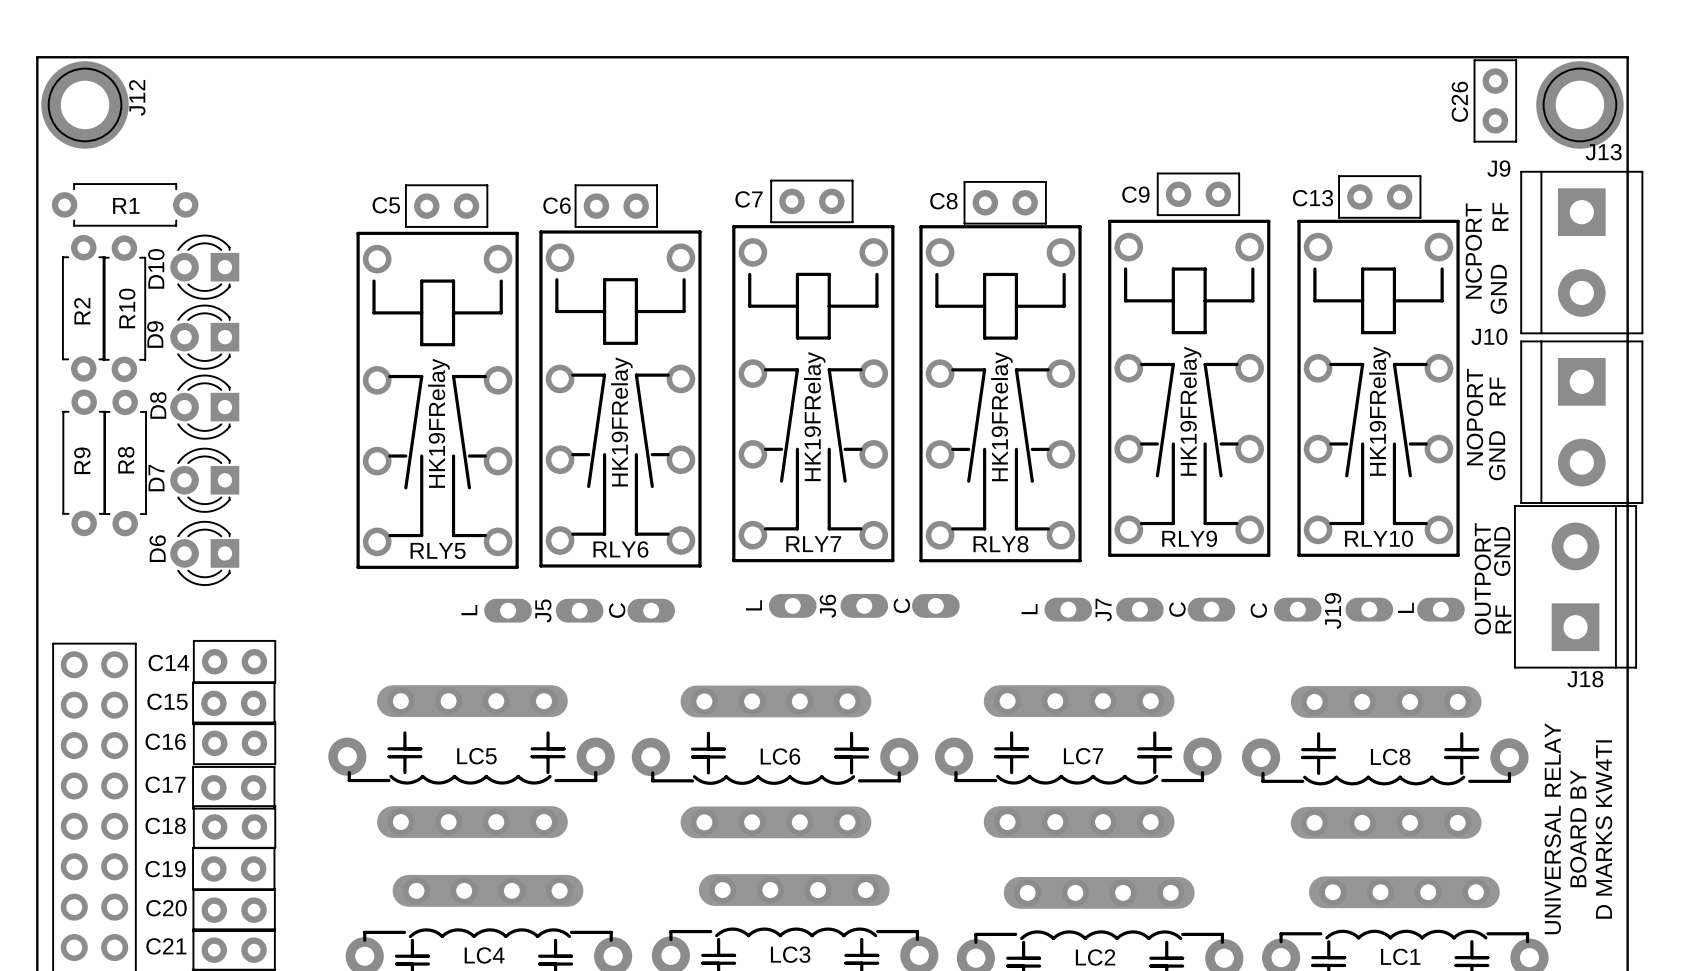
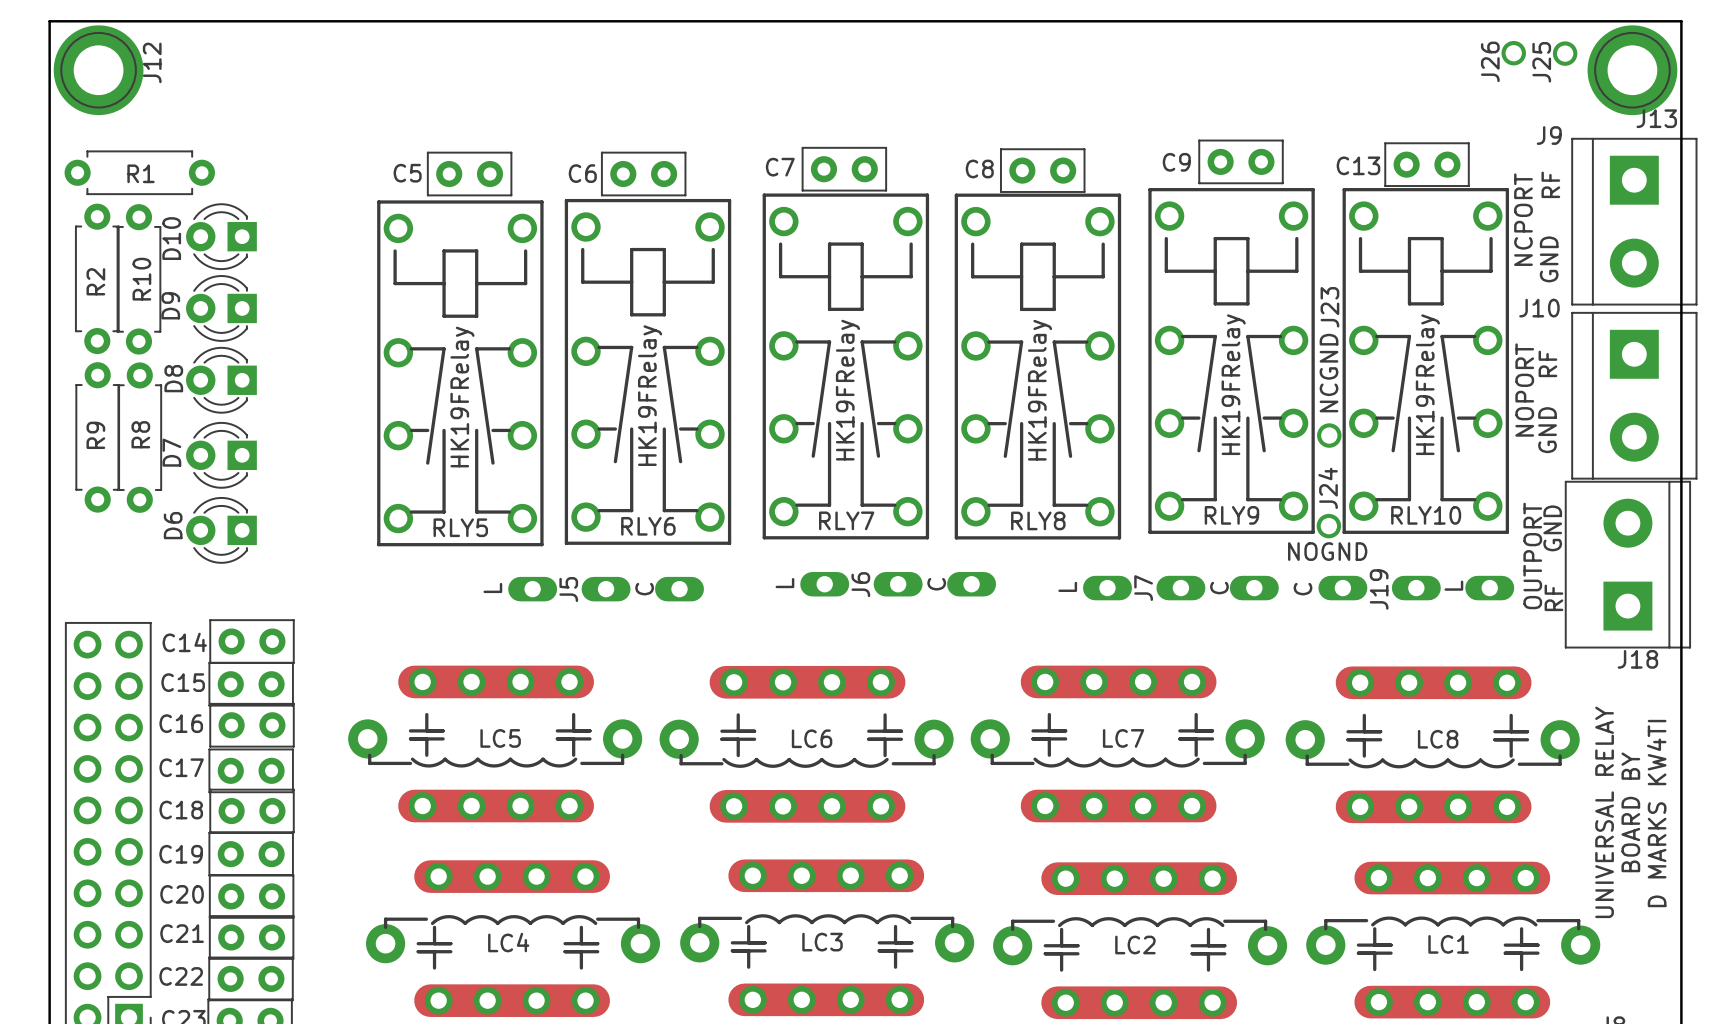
J26: none -> (1513, 53)
J25: none -> (1565, 53)
C26: (1495, 100) -> none
text: none -> NCGND (1329, 373)
J23: none -> (1329, 435)
J24: none -> (1328, 526)
text: none -> NOGND (1327, 551)

